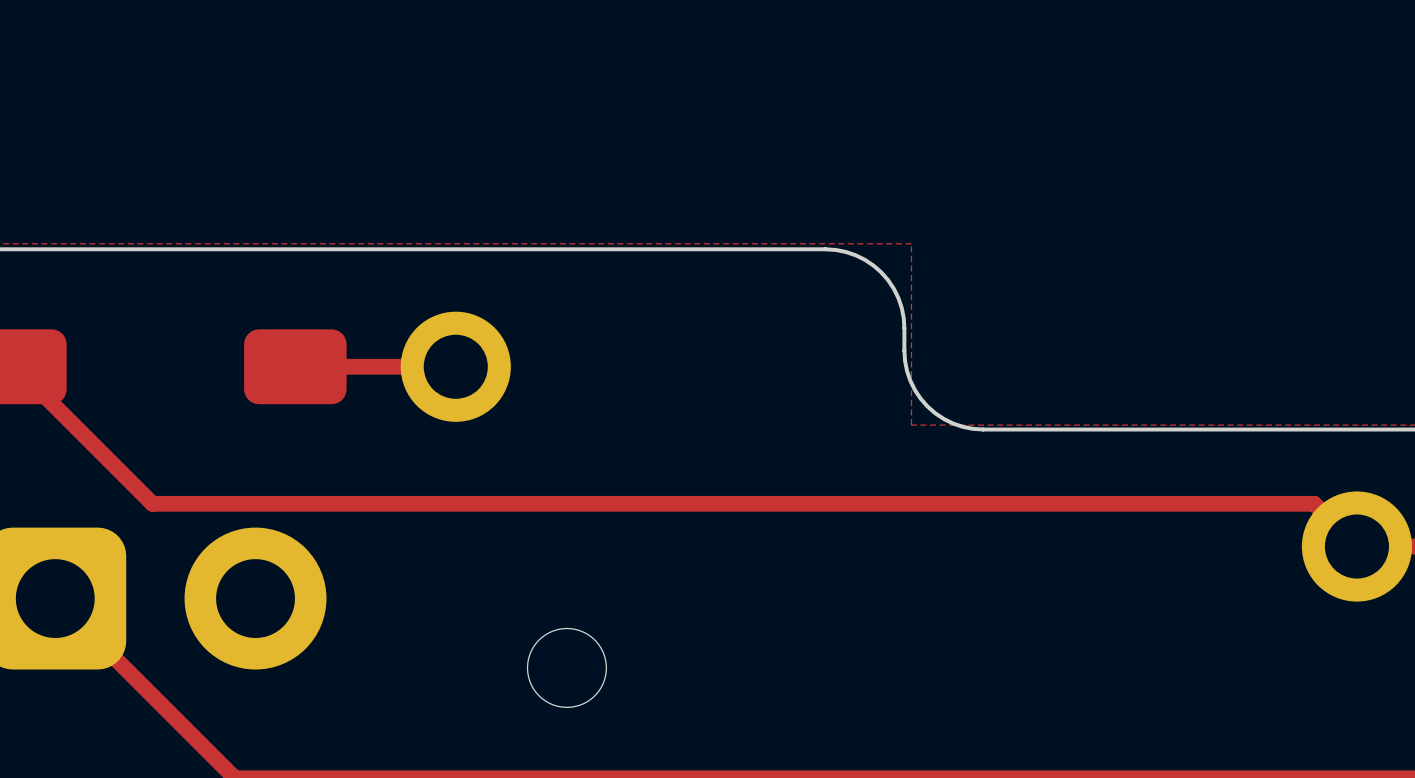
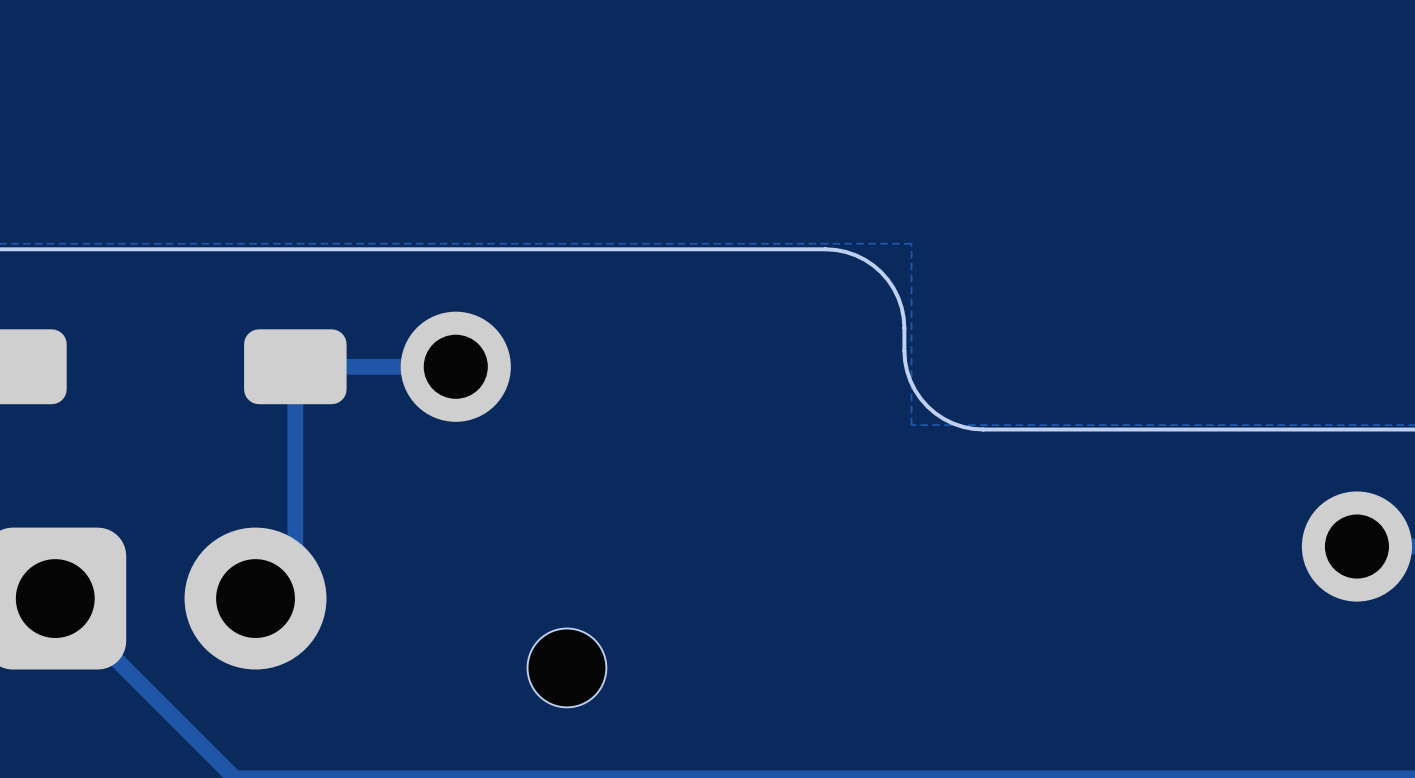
track: (15, 366) (152, 503) (1314, 503) (1356, 546) -> none
track: none -> (295, 366) (295, 558) (255, 598)

